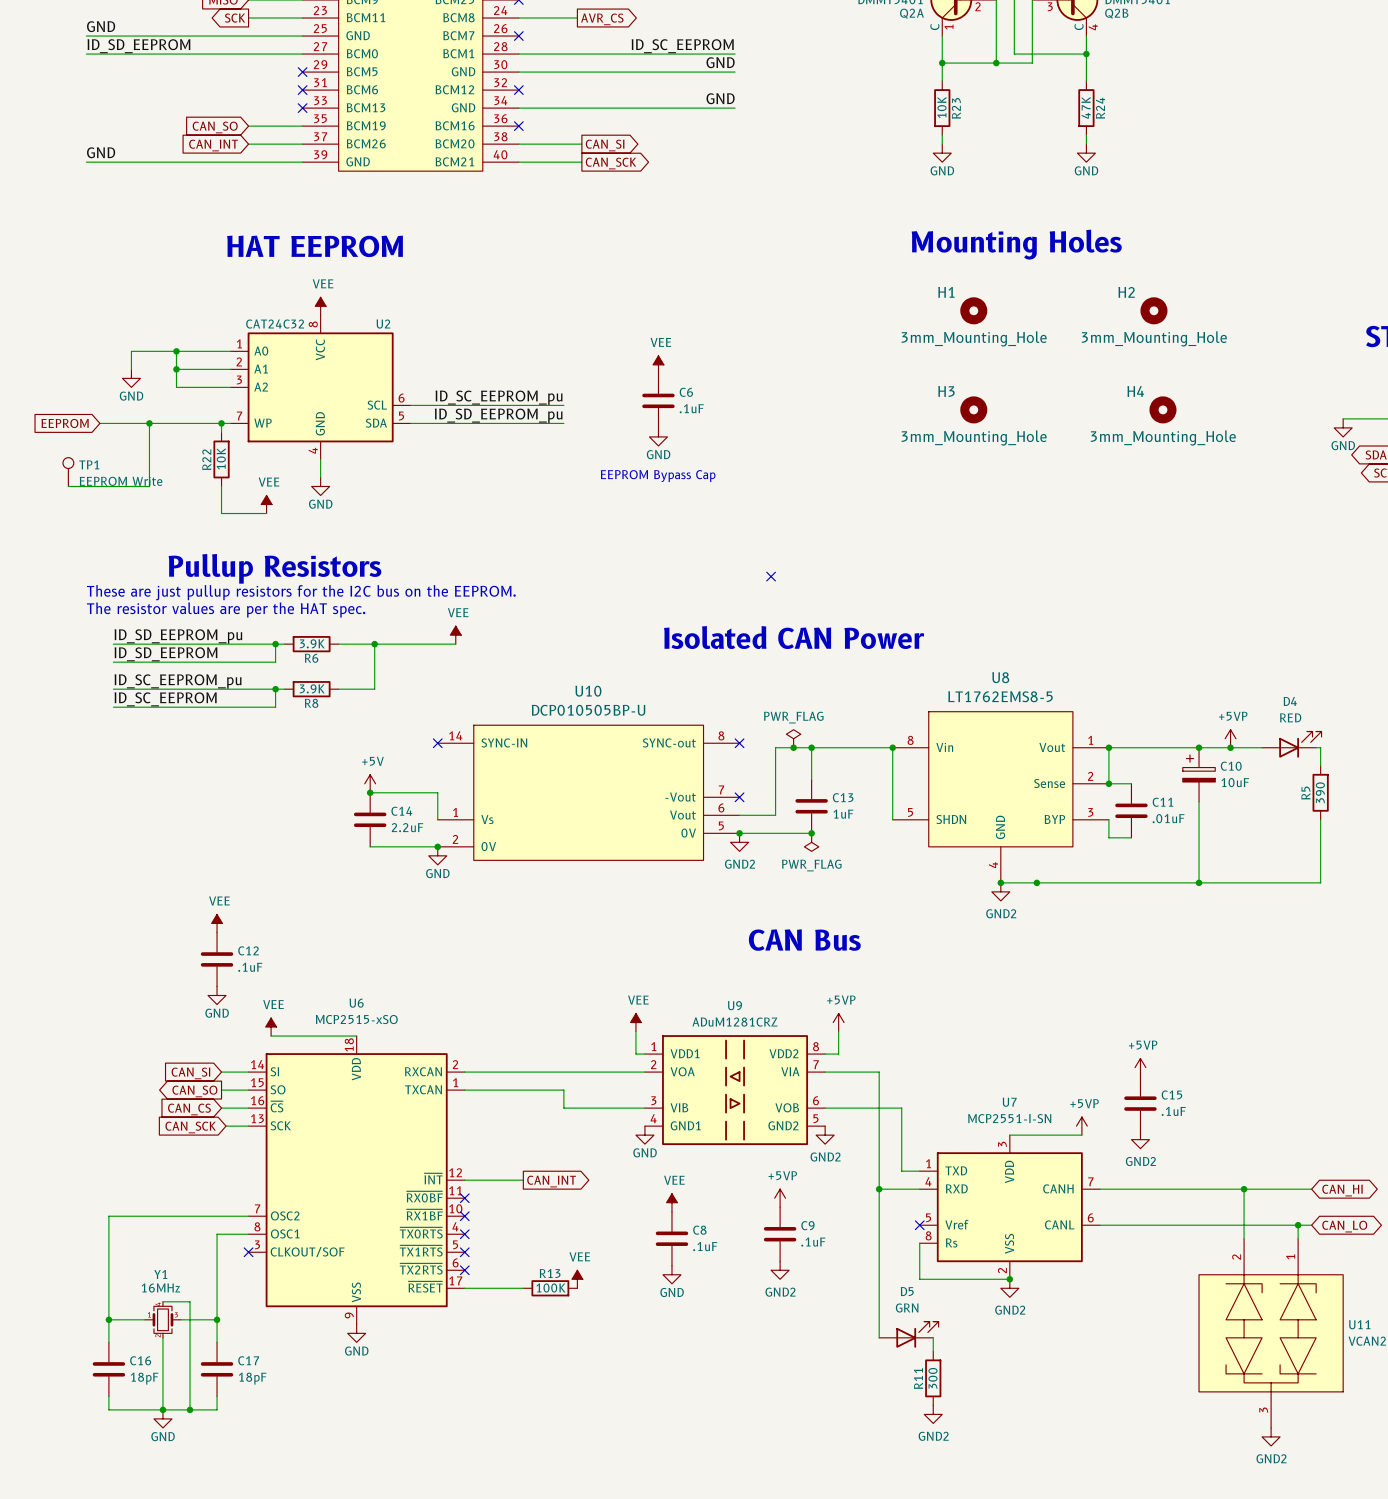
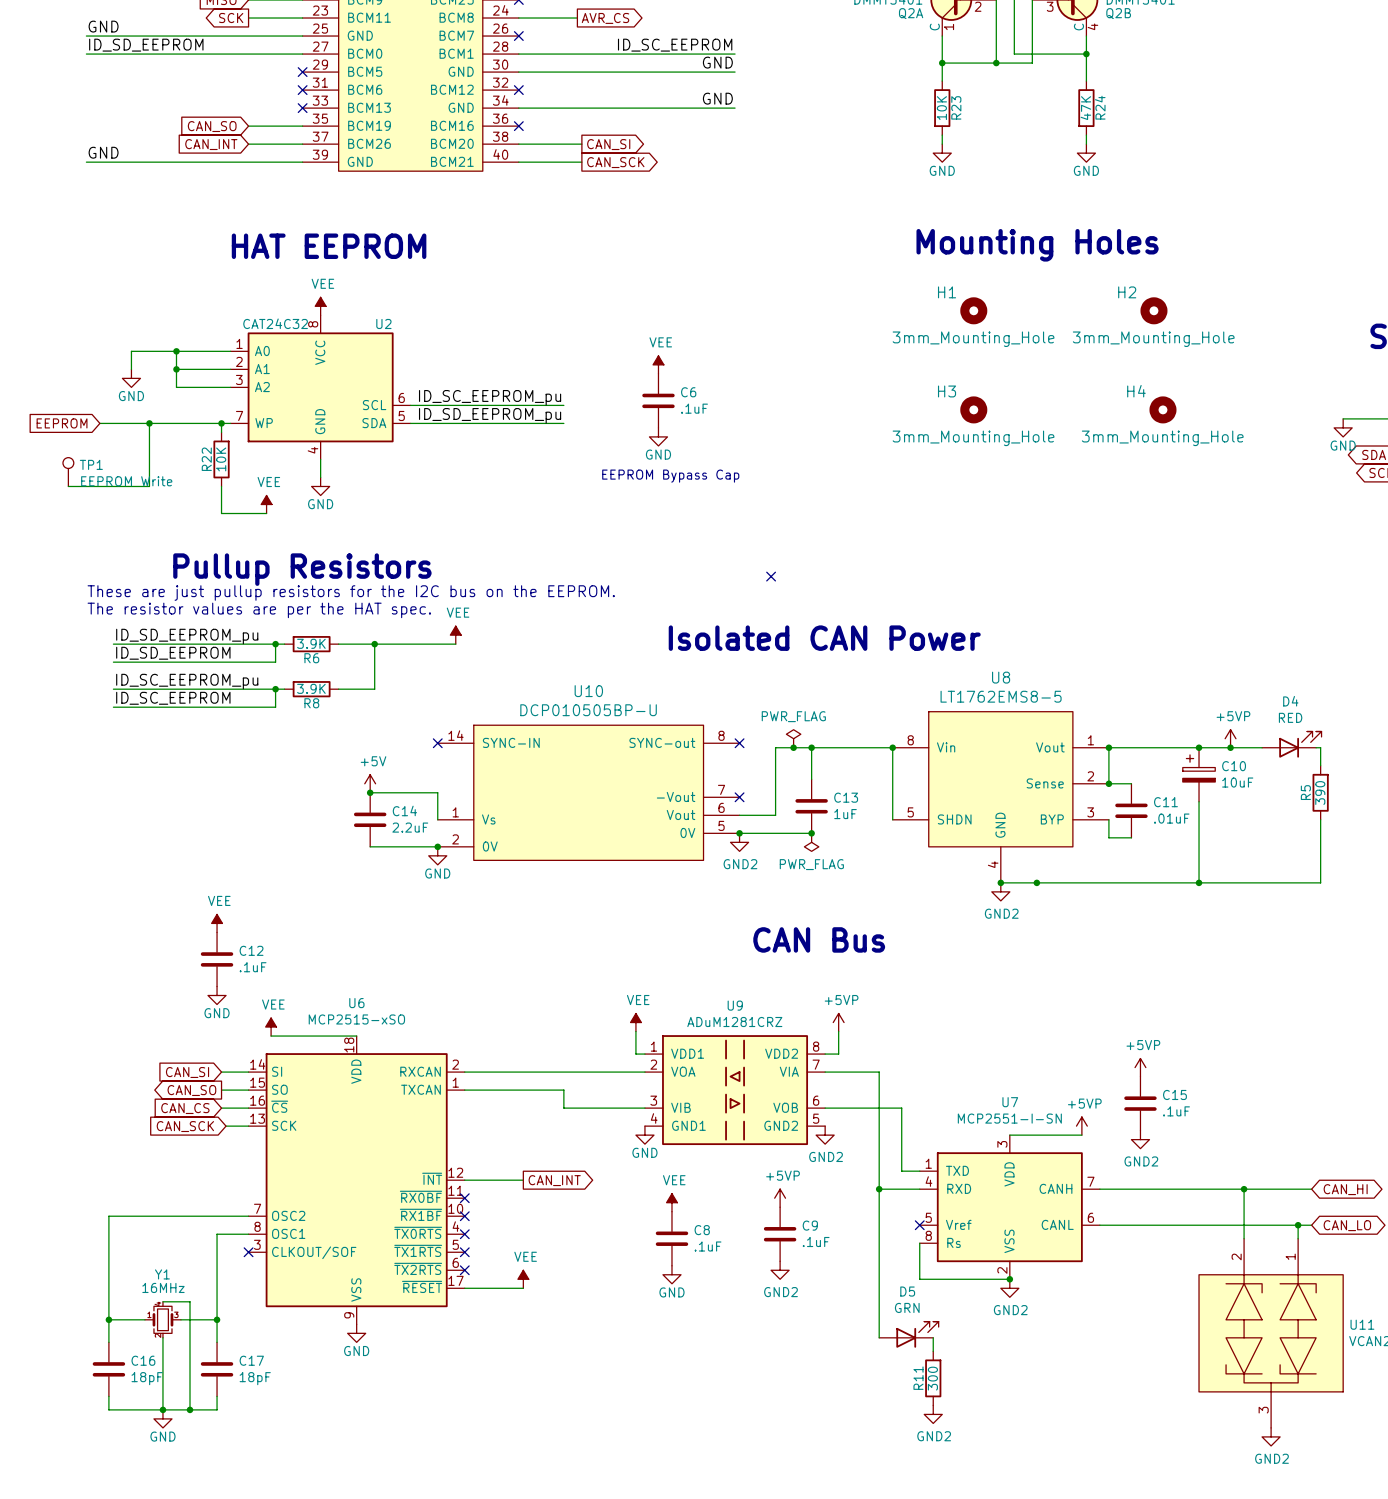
power symbol position: VEE (577, 1279) -> VEE (523, 1279)
R13: 100K (550, 1288) -> none

